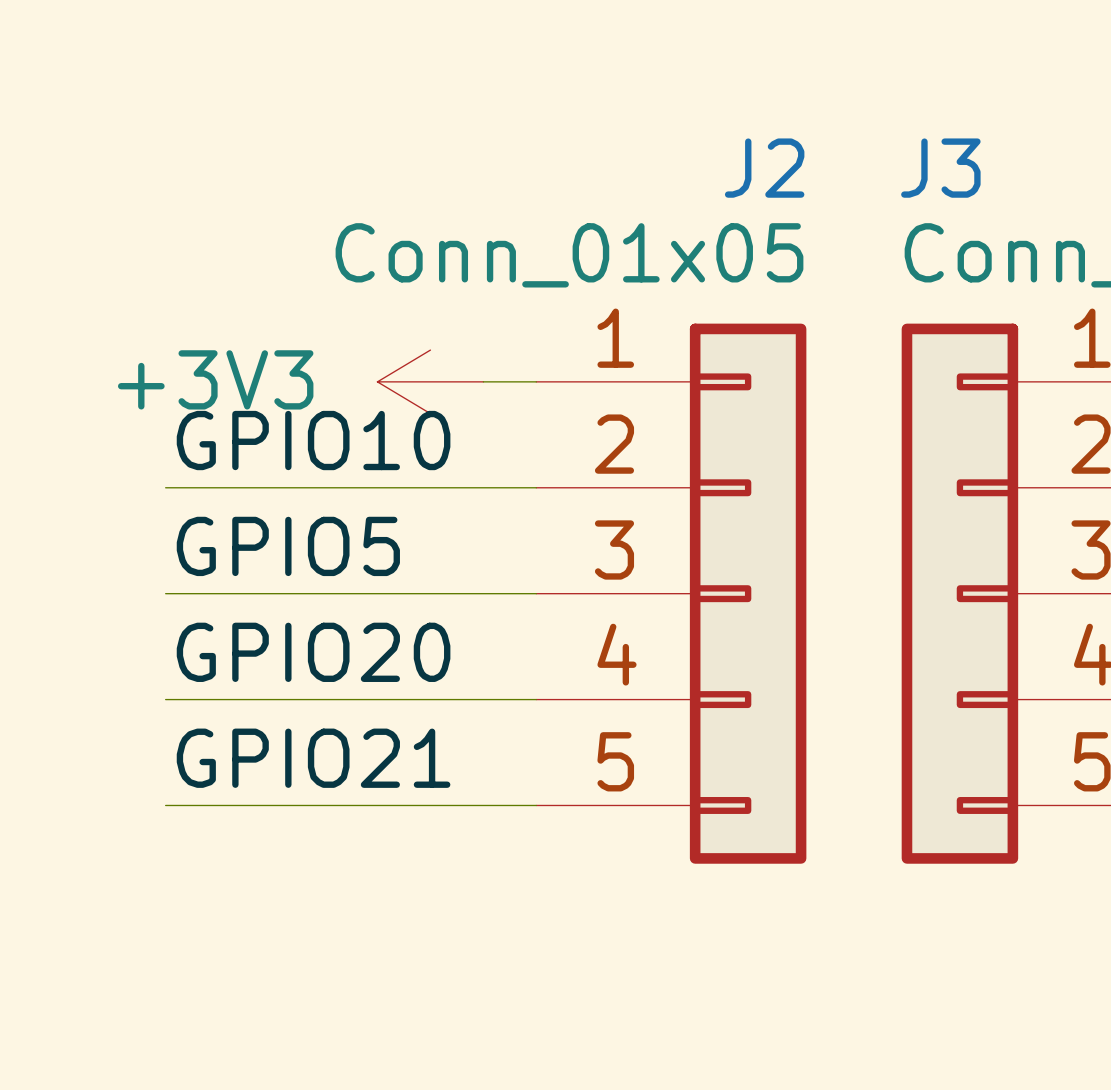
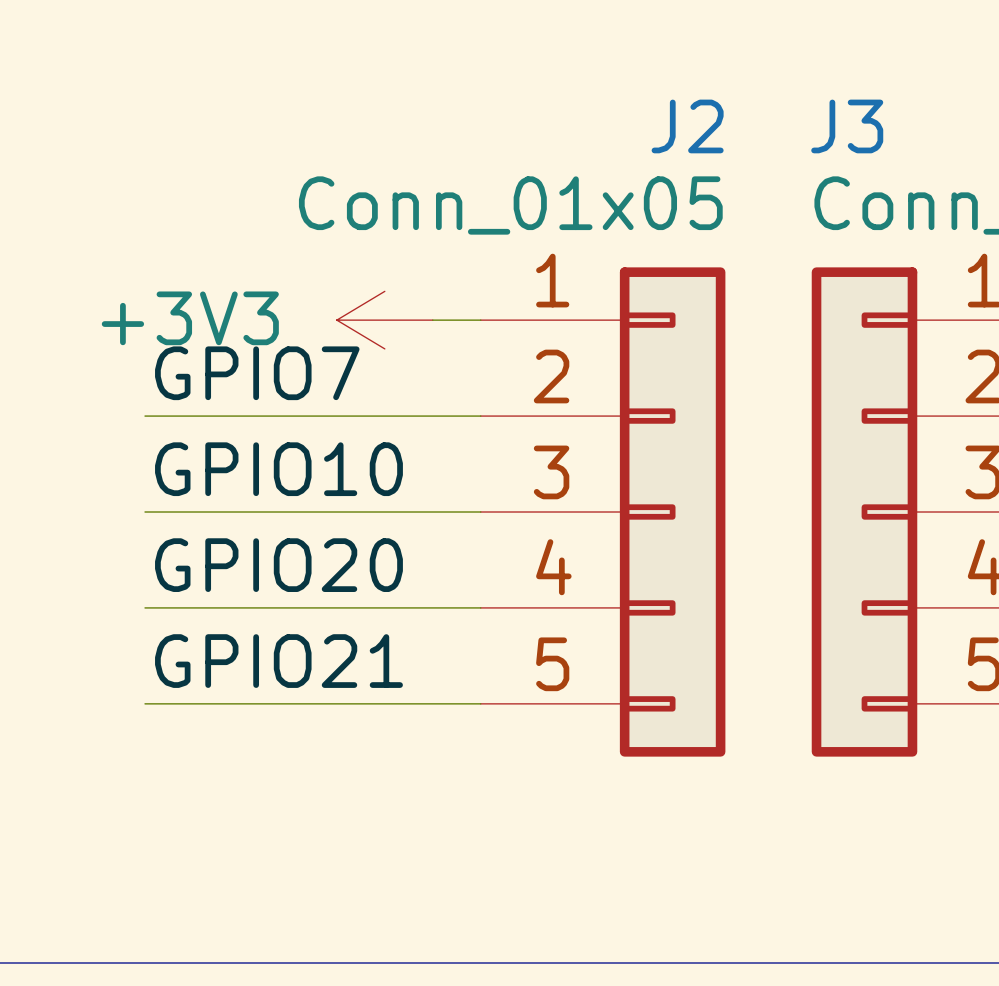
label: GPIO10 (313, 440) -> GPIO7 (257, 373)
label: GPIO5 (288, 546) -> GPIO10 (278, 469)

